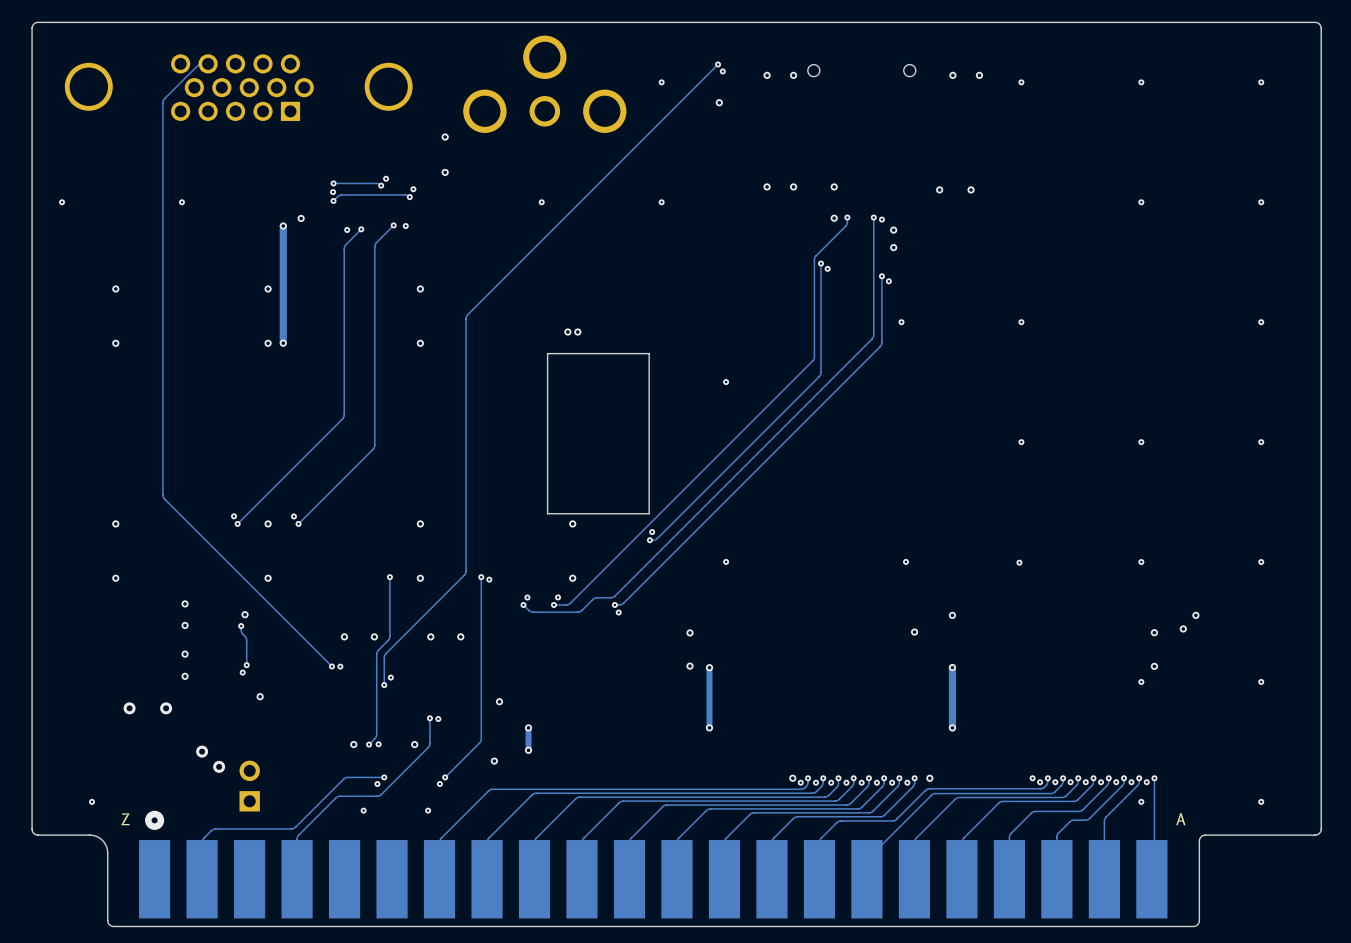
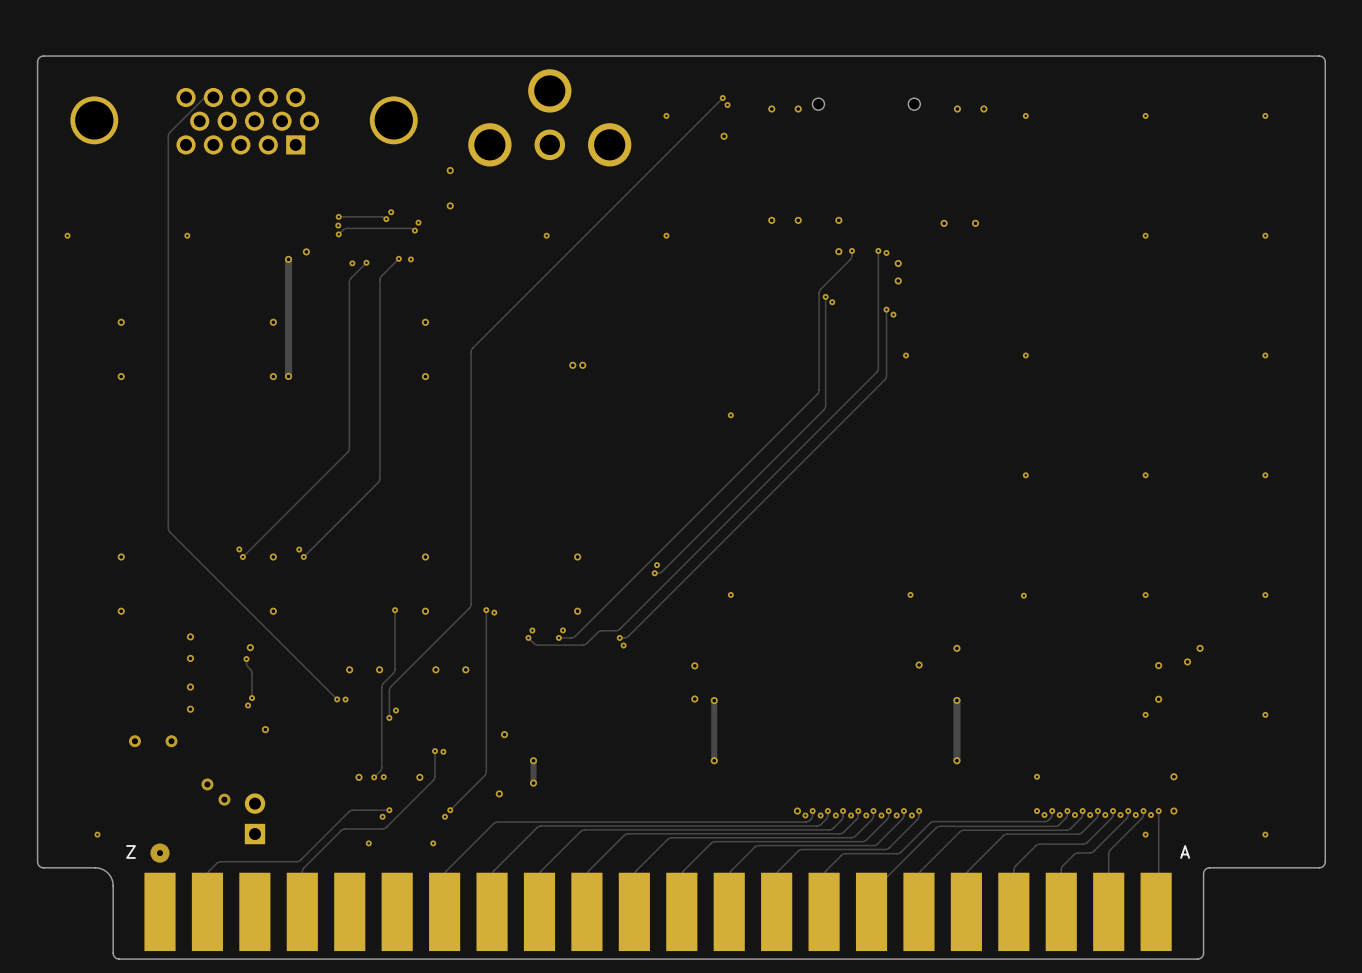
board edge: (649, 353) (547, 353) (547, 513) (649, 513) (649, 353) -> none
via: none -> (1037, 776)
via: none -> (1173, 776)
via: (929, 778) -> none
via: none -> (1173, 811)

